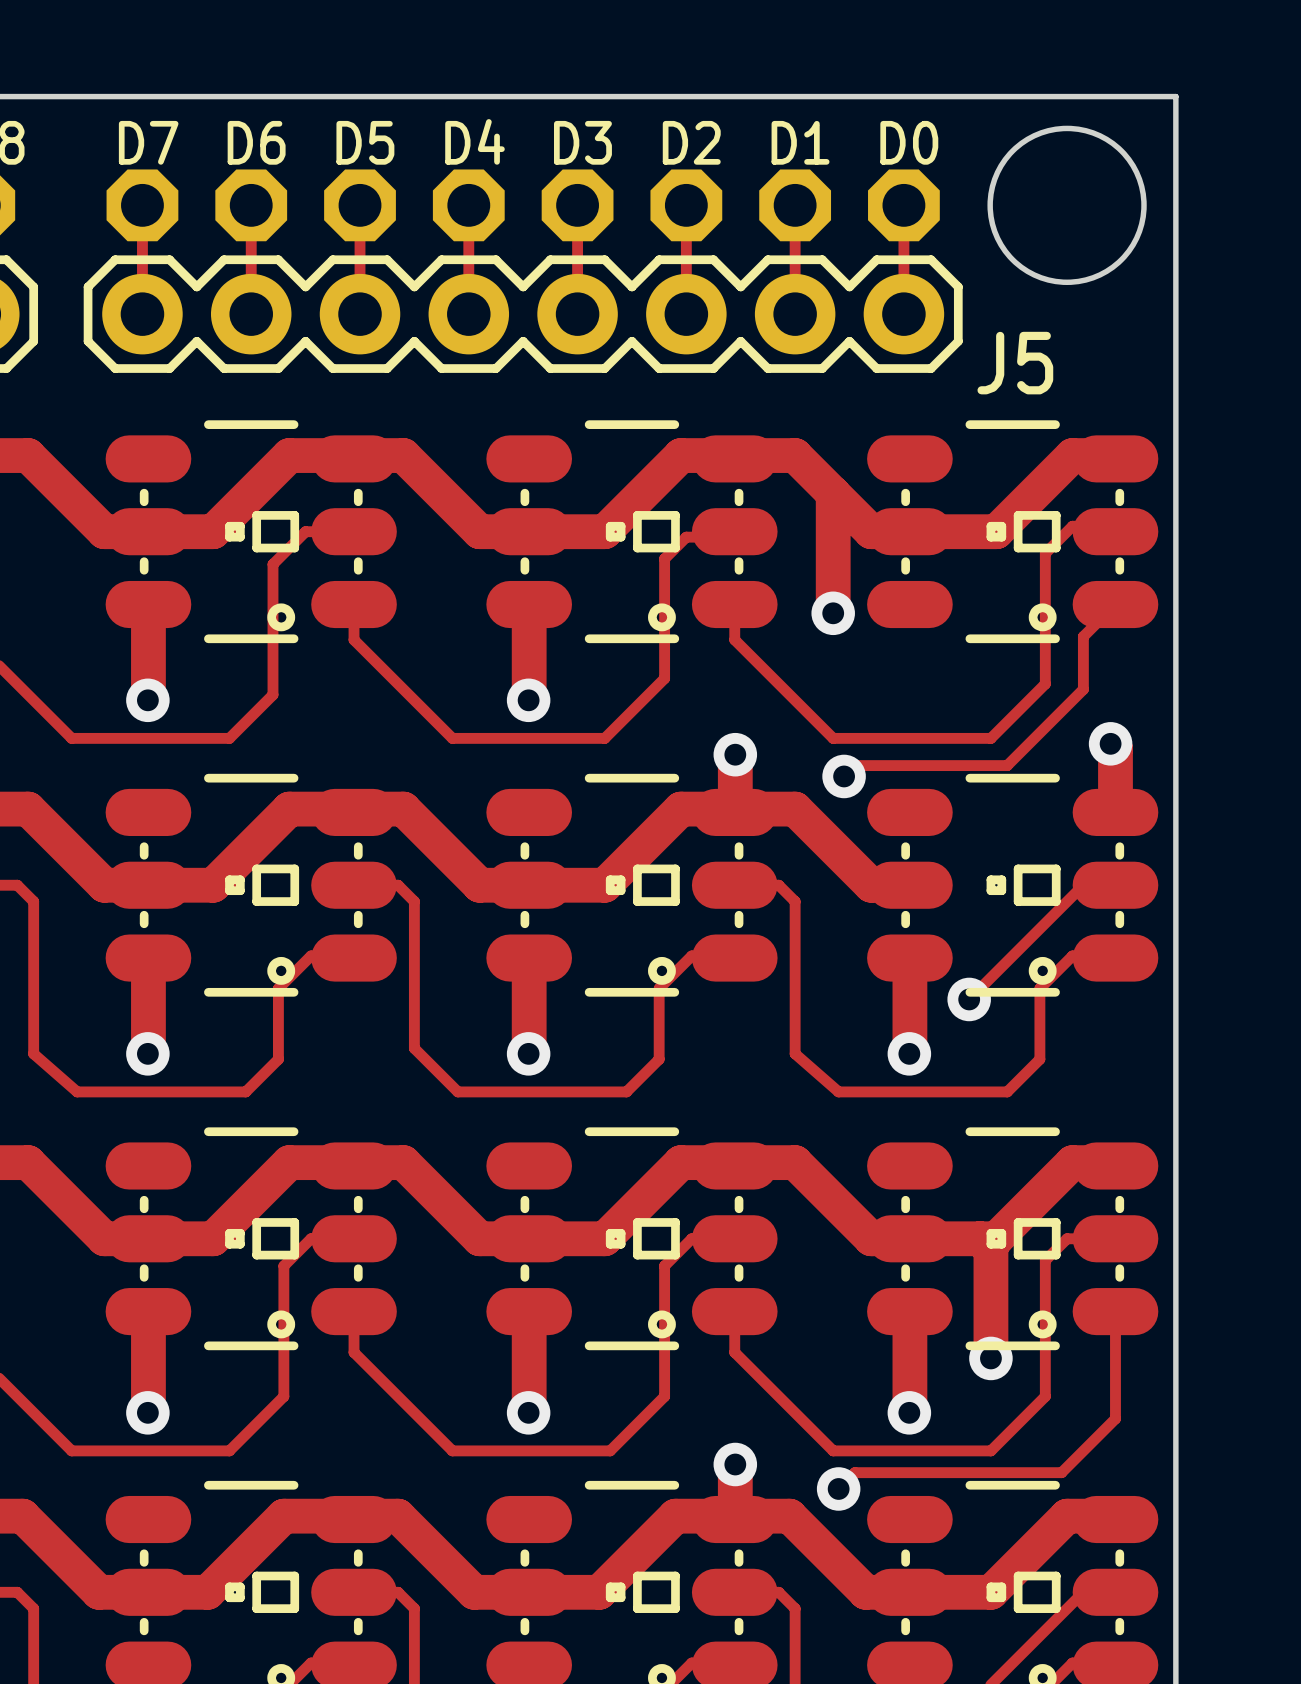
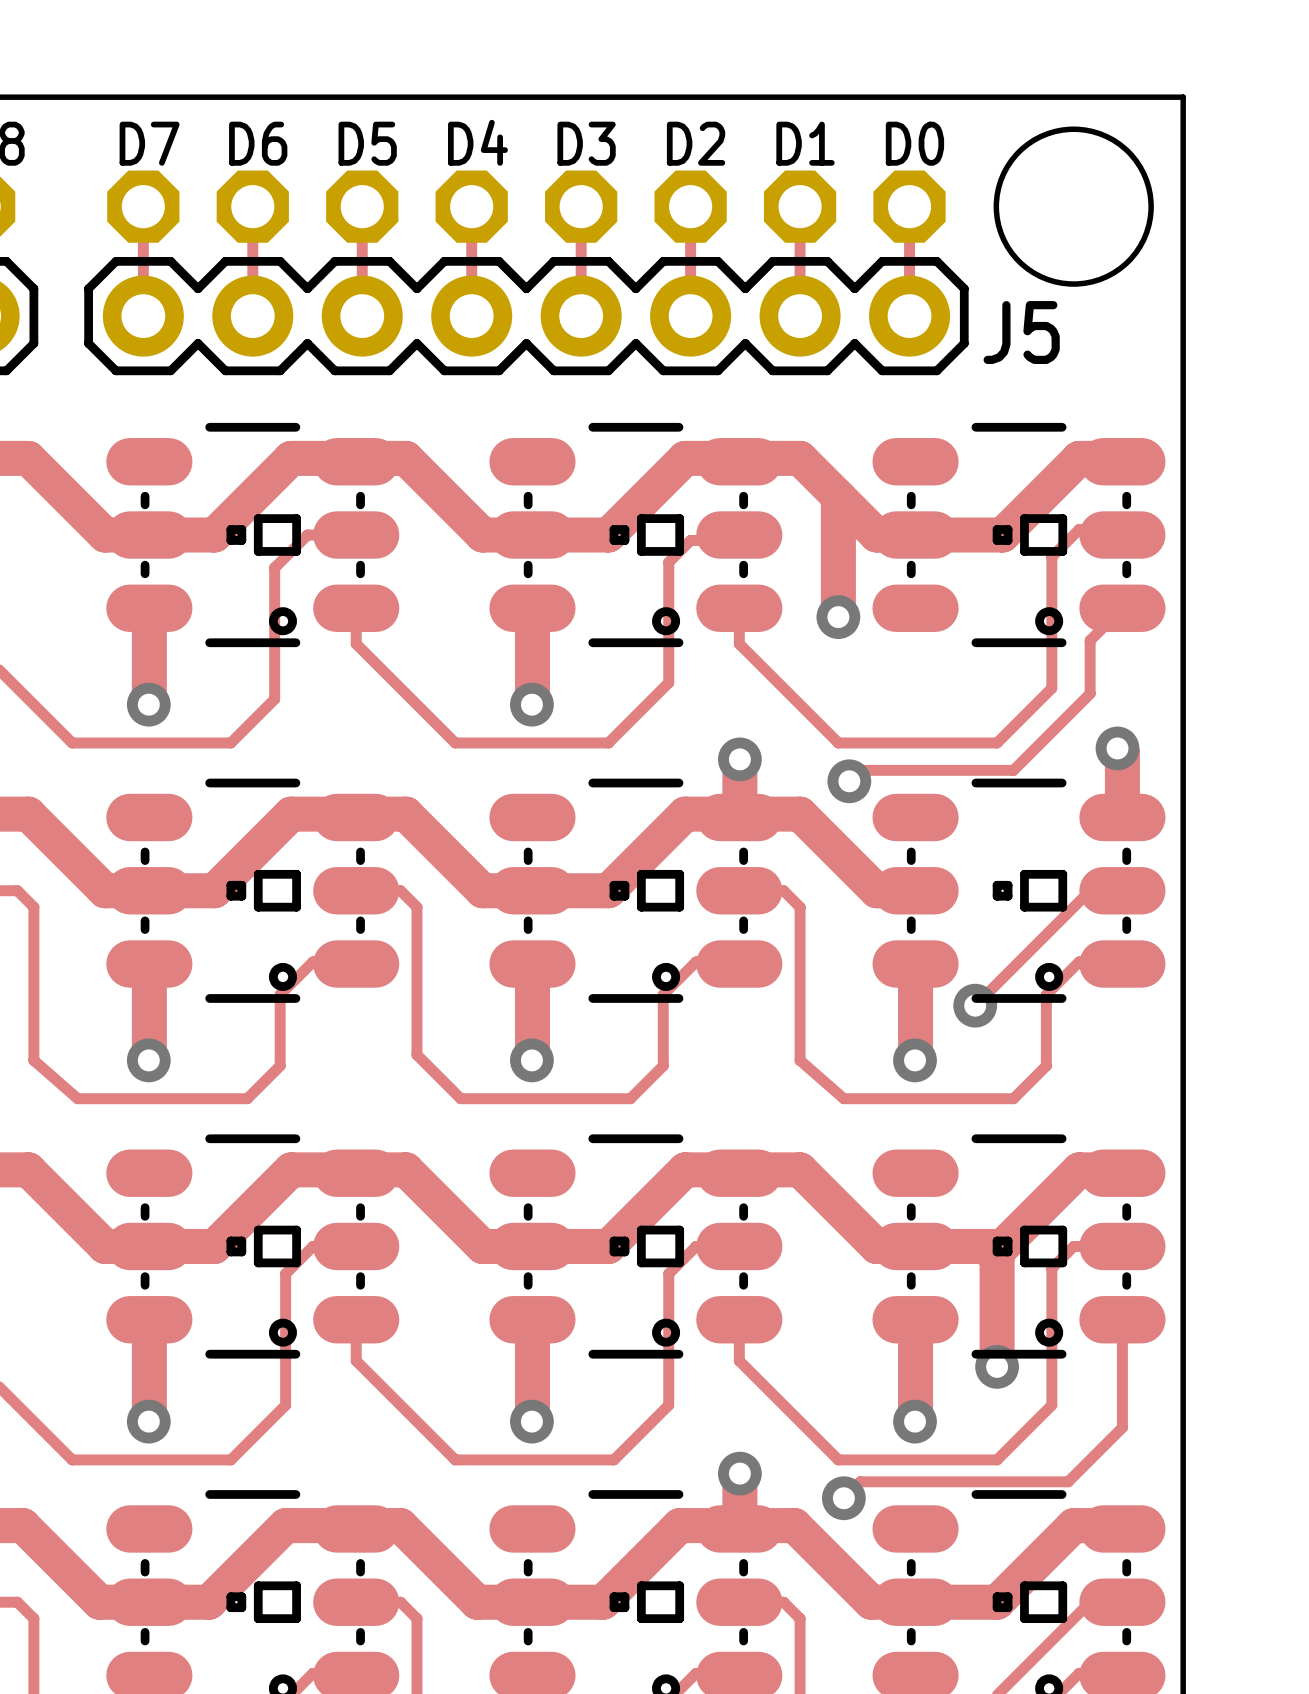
J5 name position: J5 (1015, 363) -> J5 (1021, 332)

